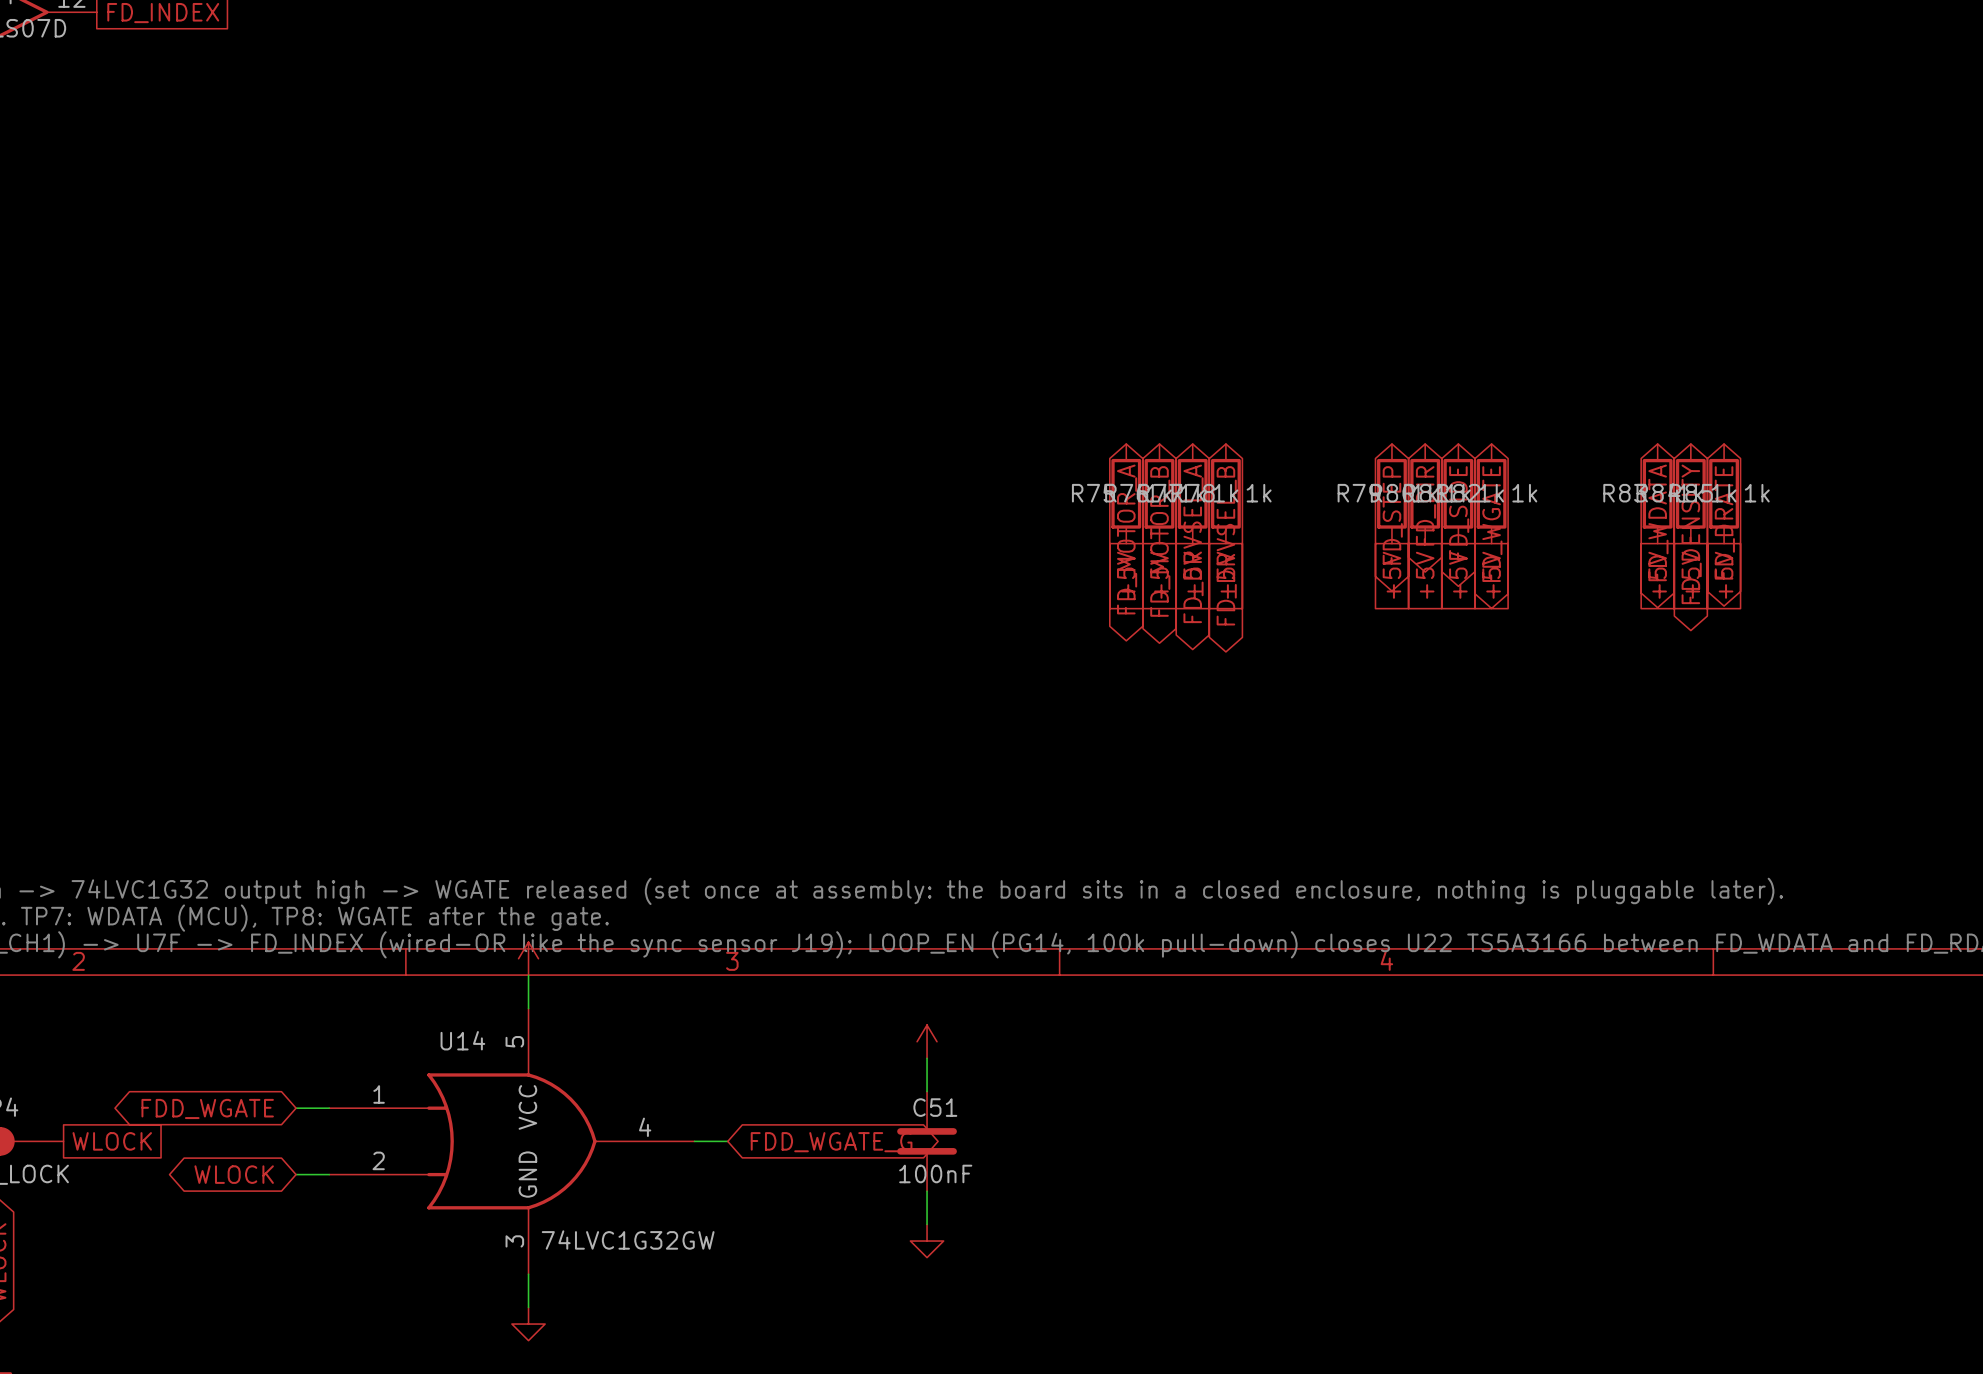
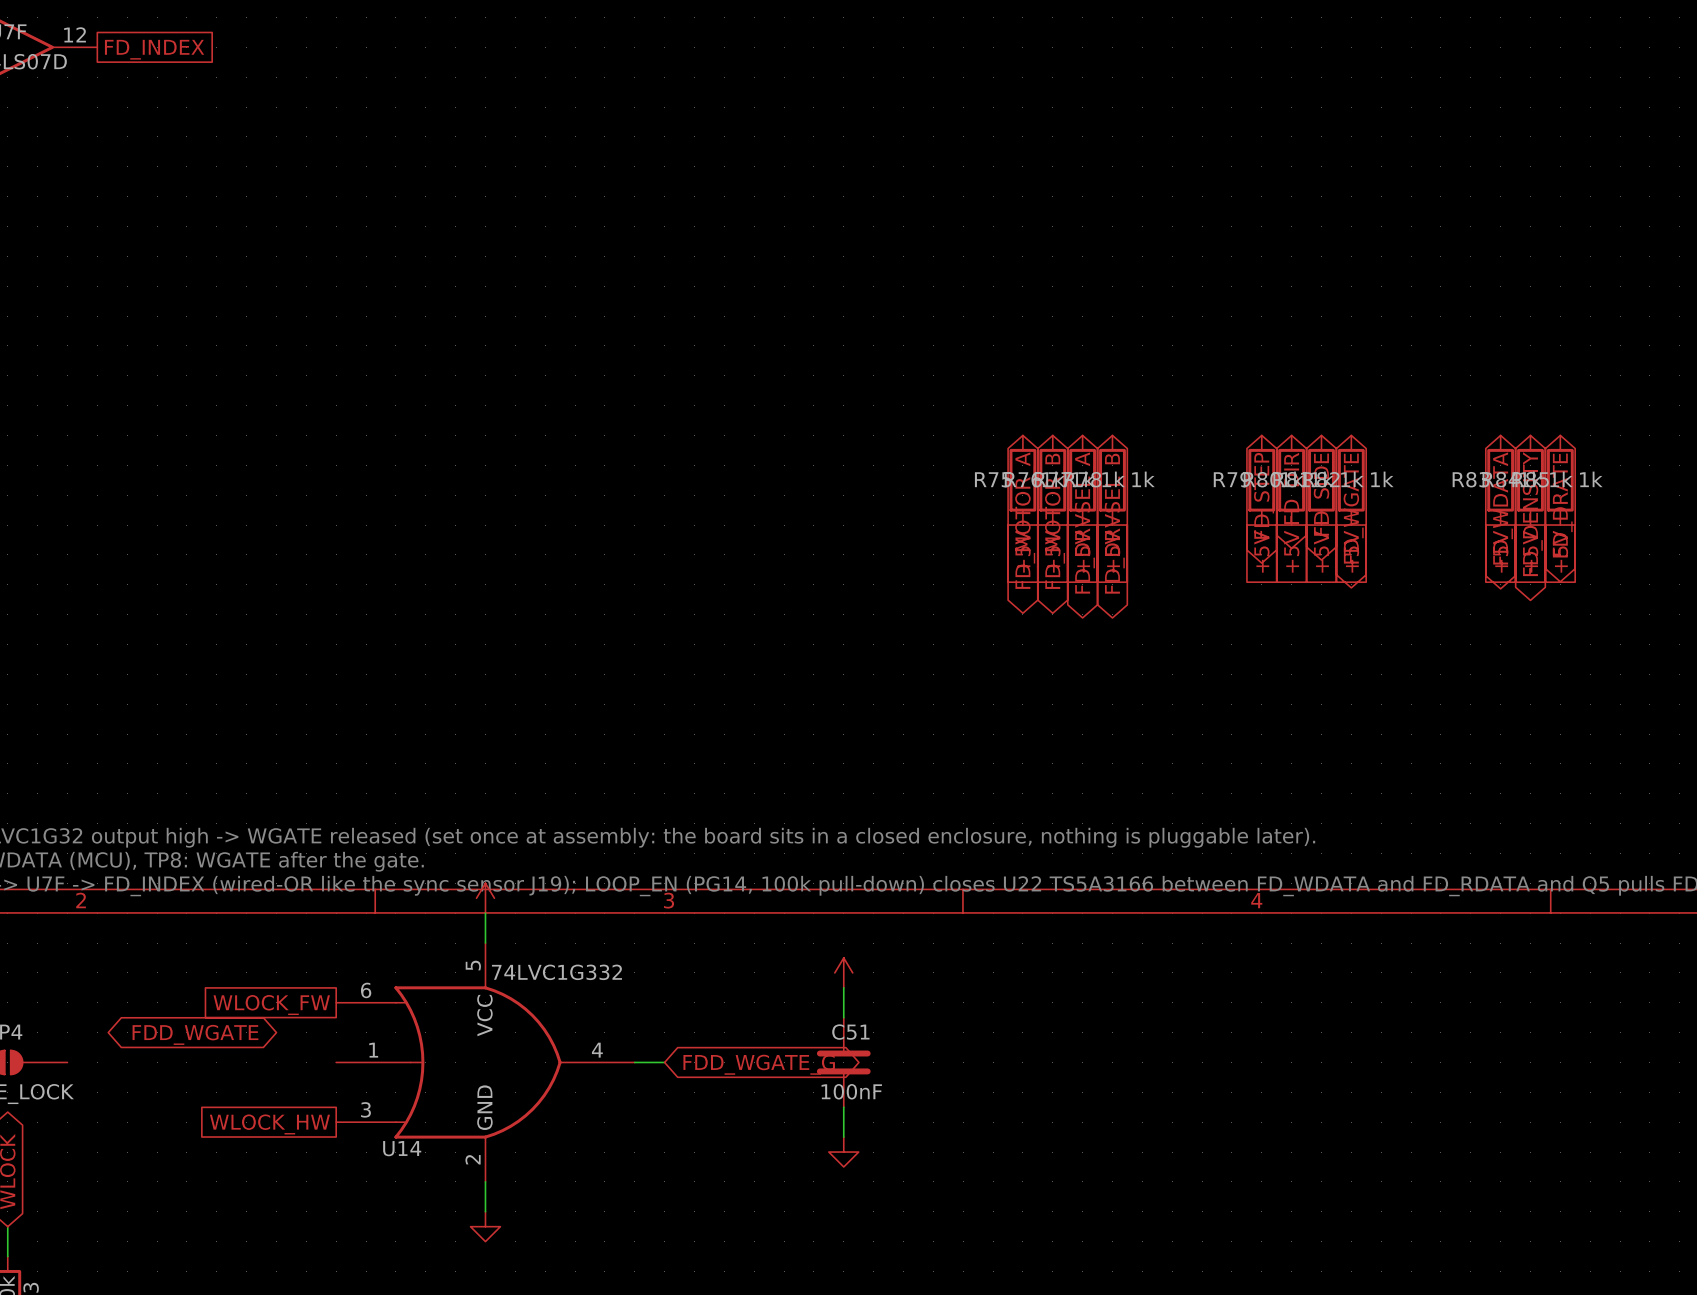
U14 symbol: [329, 1008, 695, 1275] -> [336, 943, 635, 1182]
U14 name position: U14 (462, 1040) -> U14 (402, 1148)
global label: none -> WLOCK_FW (271, 1005)
wire: (296, 1108) (329, 1108) -> none
global label: WLOCK (112, 1141) -> none
global label shape: bidirectional (234, 1174) -> passive (269, 1124)
global label: WLOCK (234, 1174) -> WLOCK_HW (269, 1124)
wire: (296, 1174) (329, 1174) -> none
U14 value: 74LVC1G32GW (628, 1240) -> 74LVC1G332 (556, 972)

